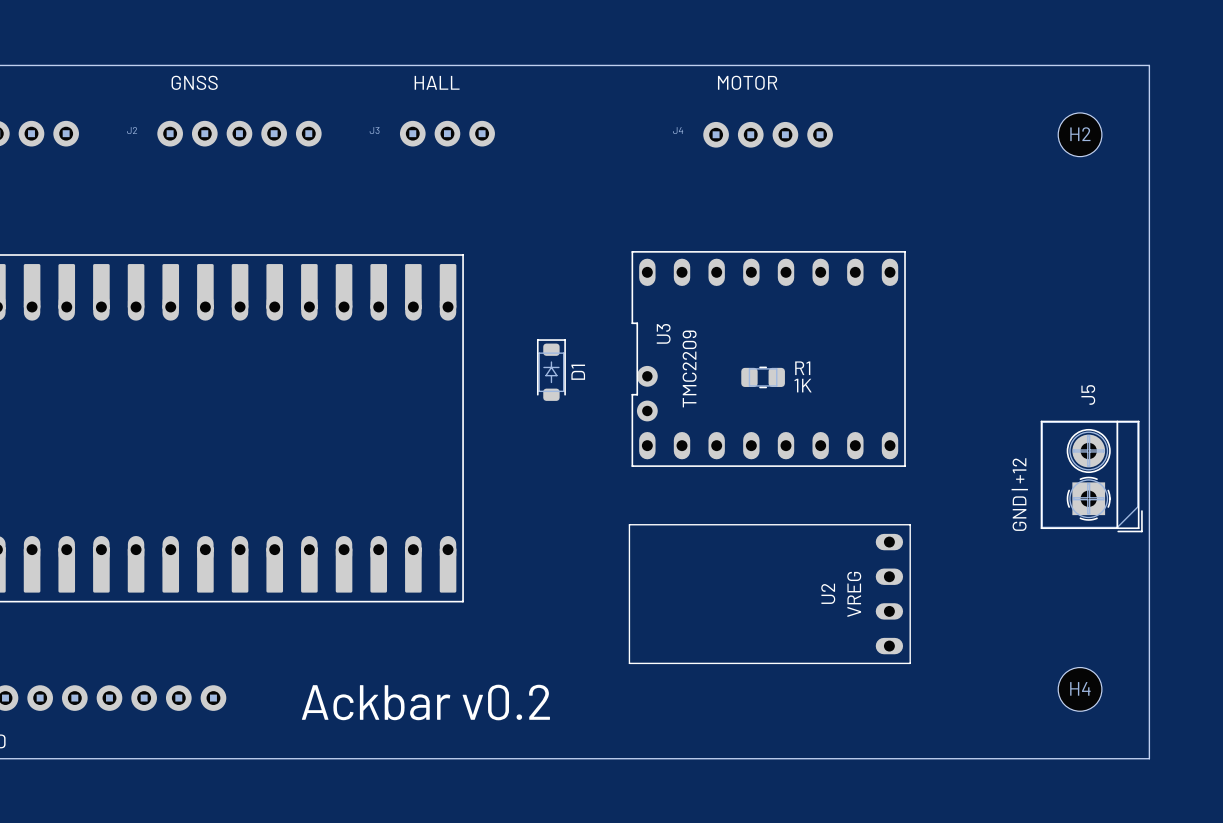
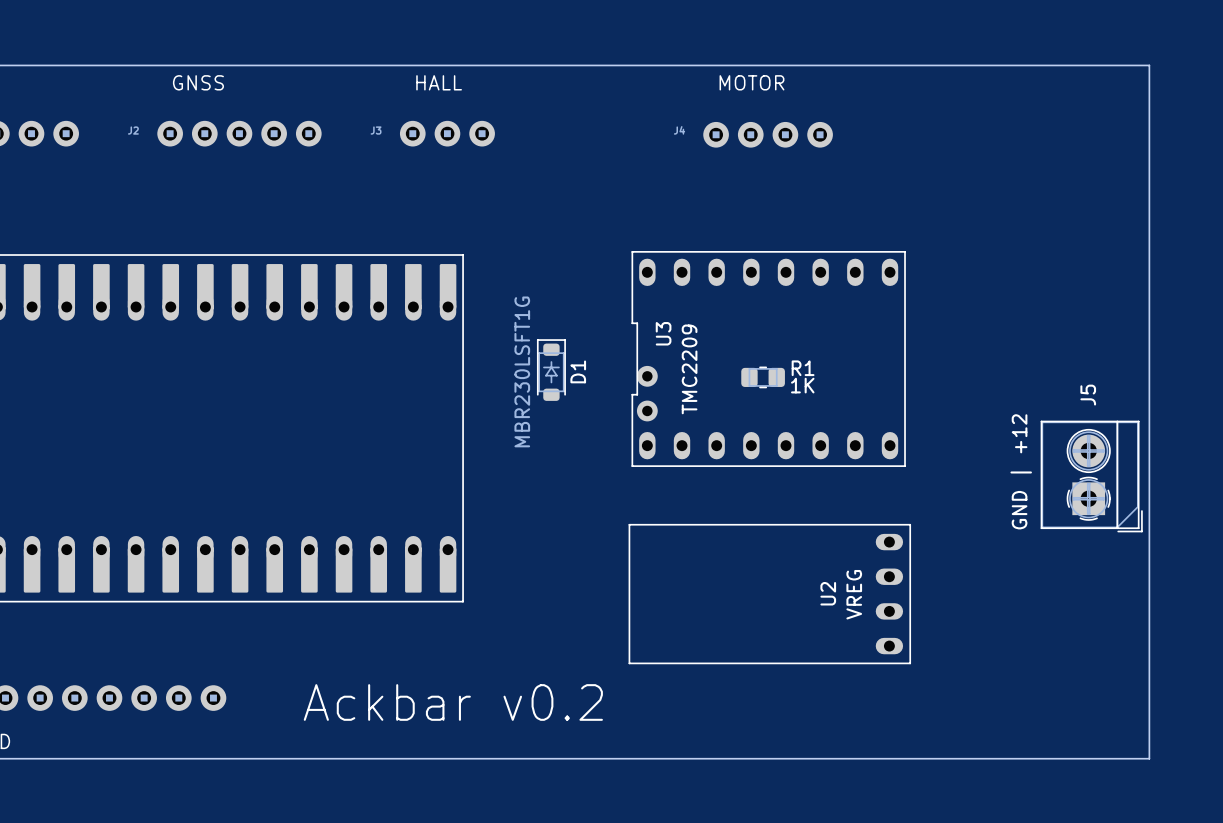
H2: (1080, 134) -> none
D1 value: none -> MBR230LSFT1G (522, 371)
H4: (1080, 689) -> none

